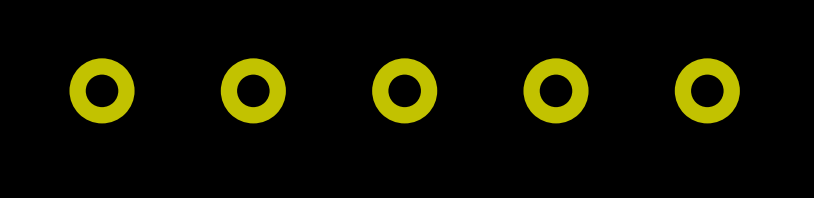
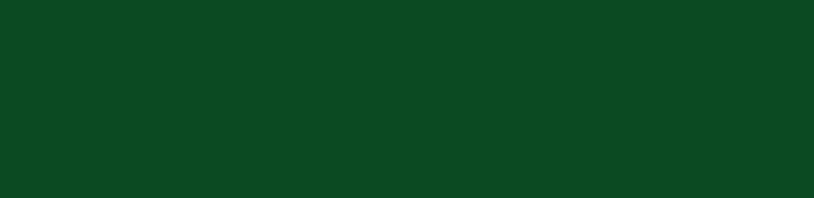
part: (102, 90) -> none
part: (253, 90) -> none
part: (404, 90) -> none
part: (556, 90) -> none
part: (707, 90) -> none

